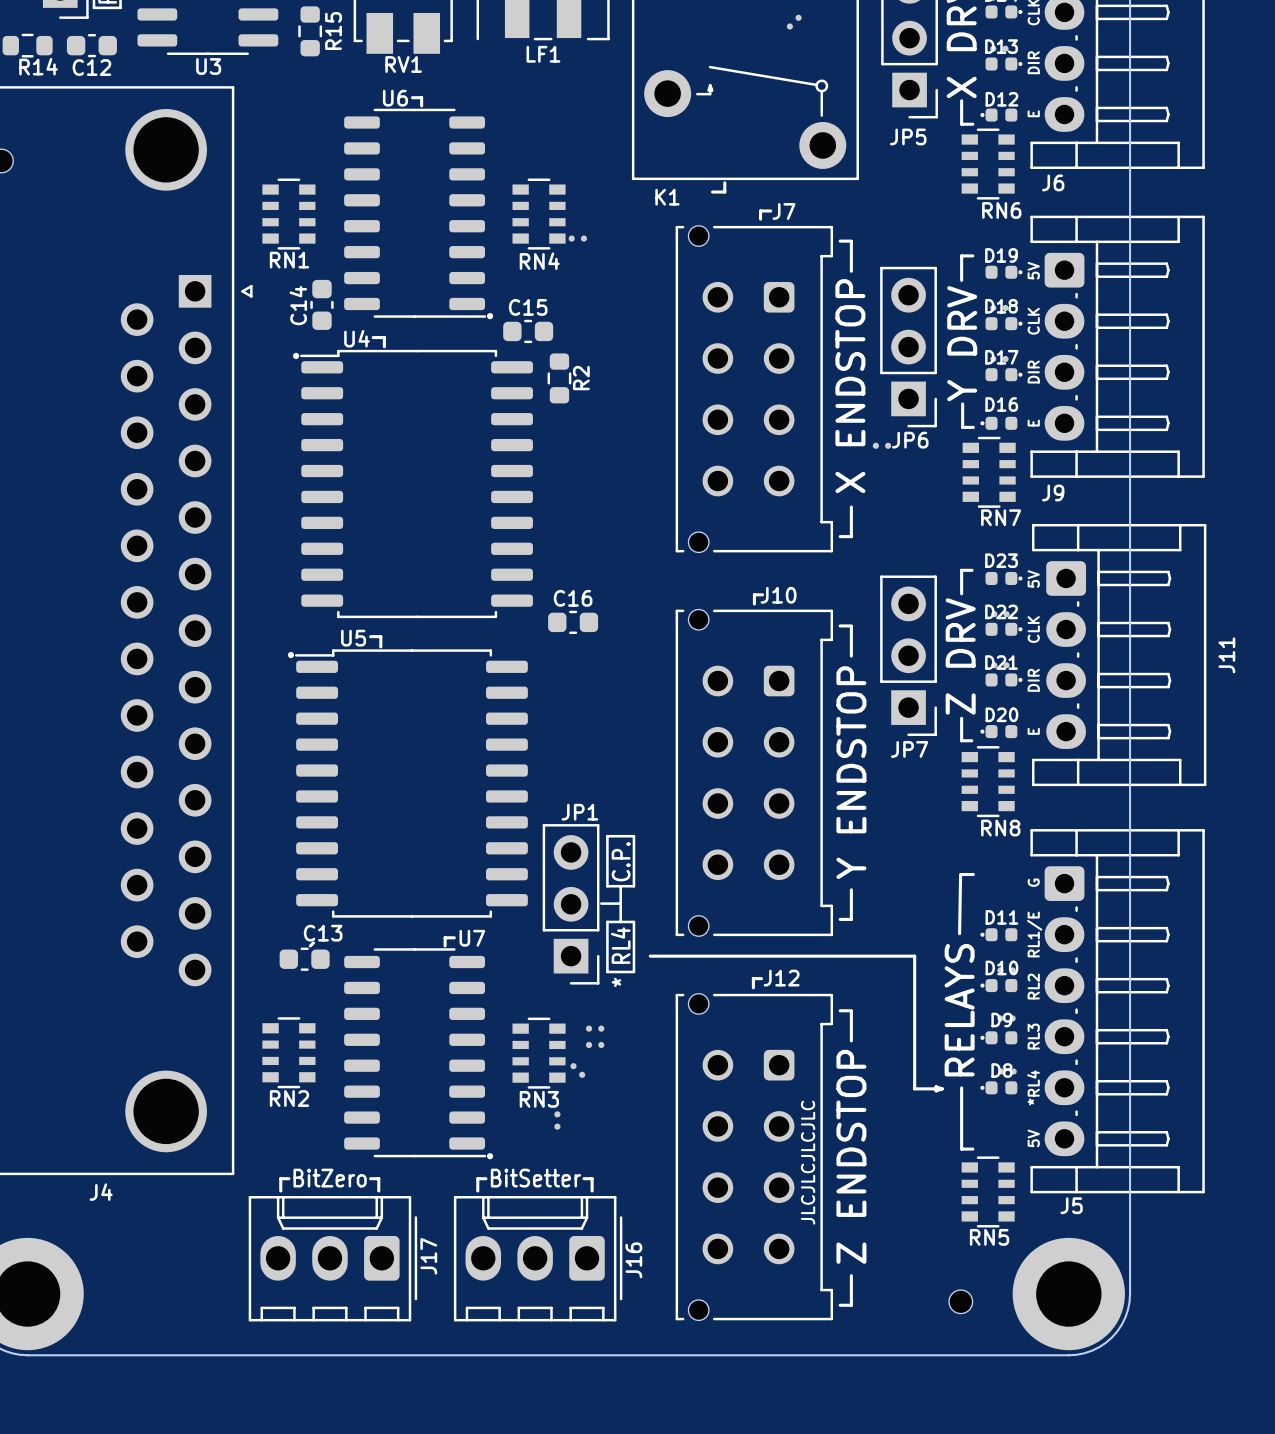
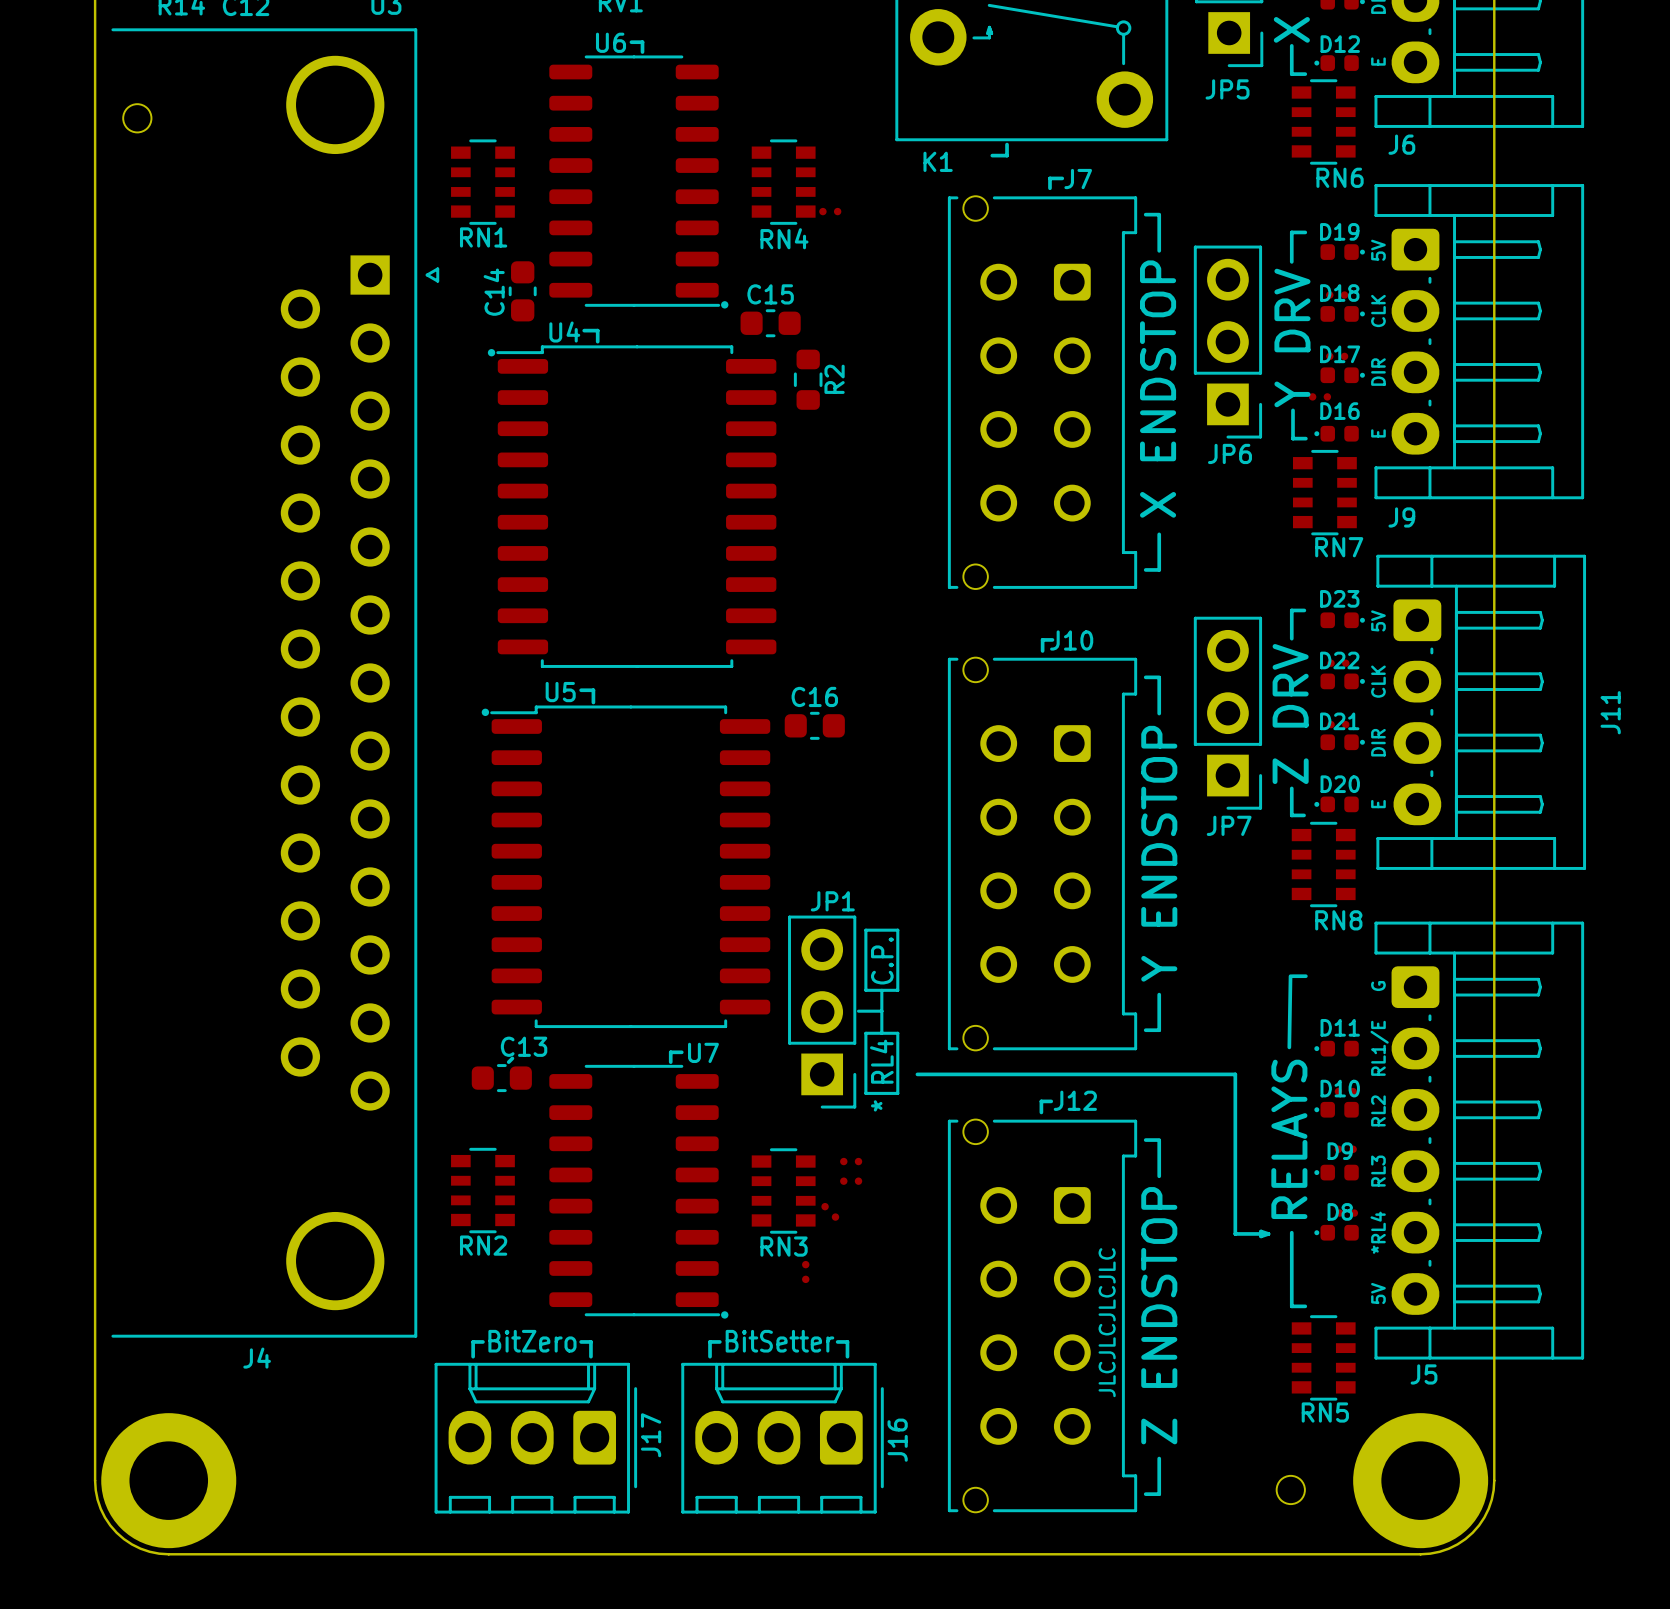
part position: (882, 445) -> (1320, 396)
C16 position: (573, 622) -> (814, 725)

